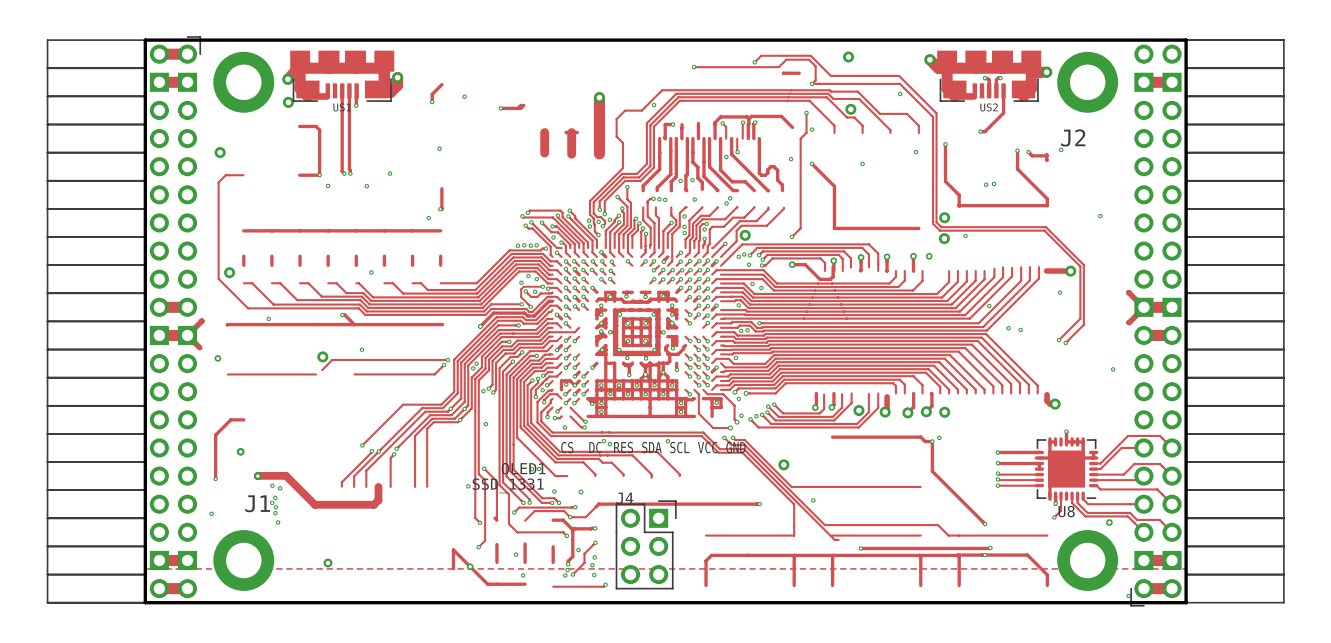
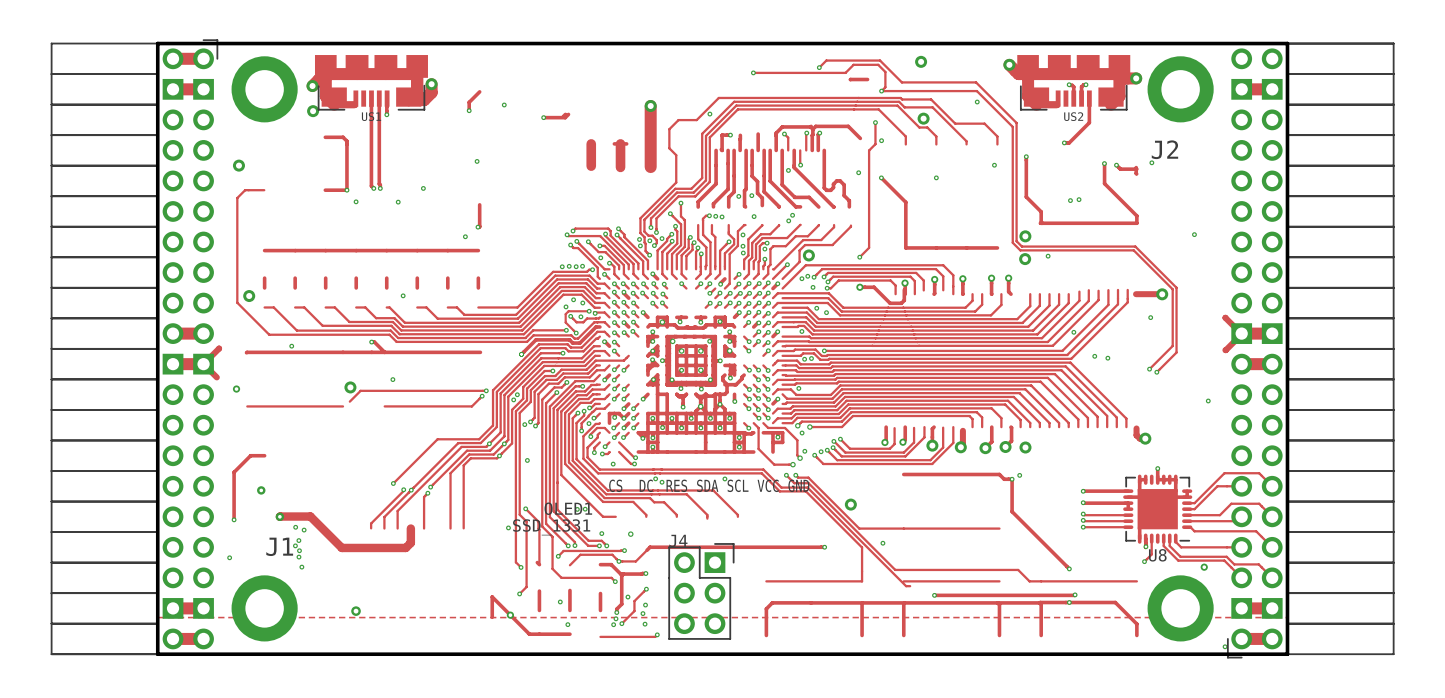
track: none -> (1008, 278) (1008, 291) (1011, 294)
track: none -> (934, 427) (932, 428) (932, 445)

